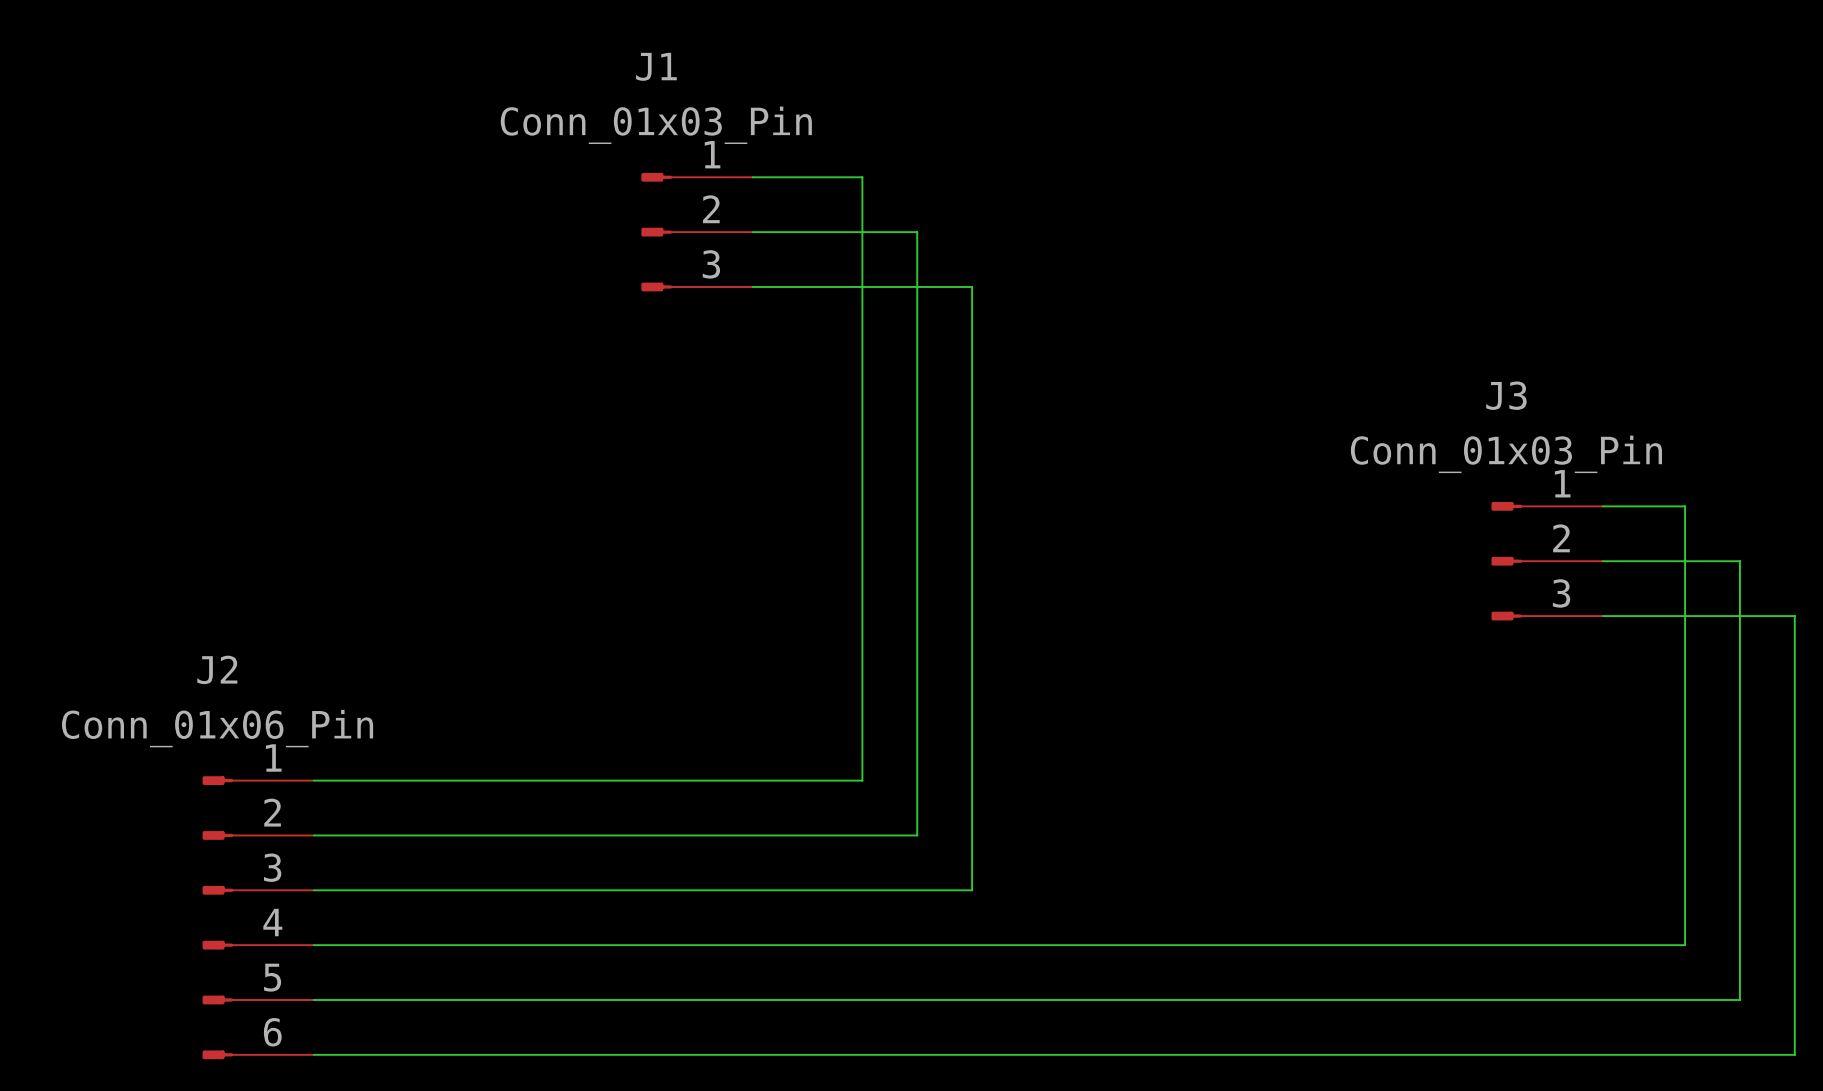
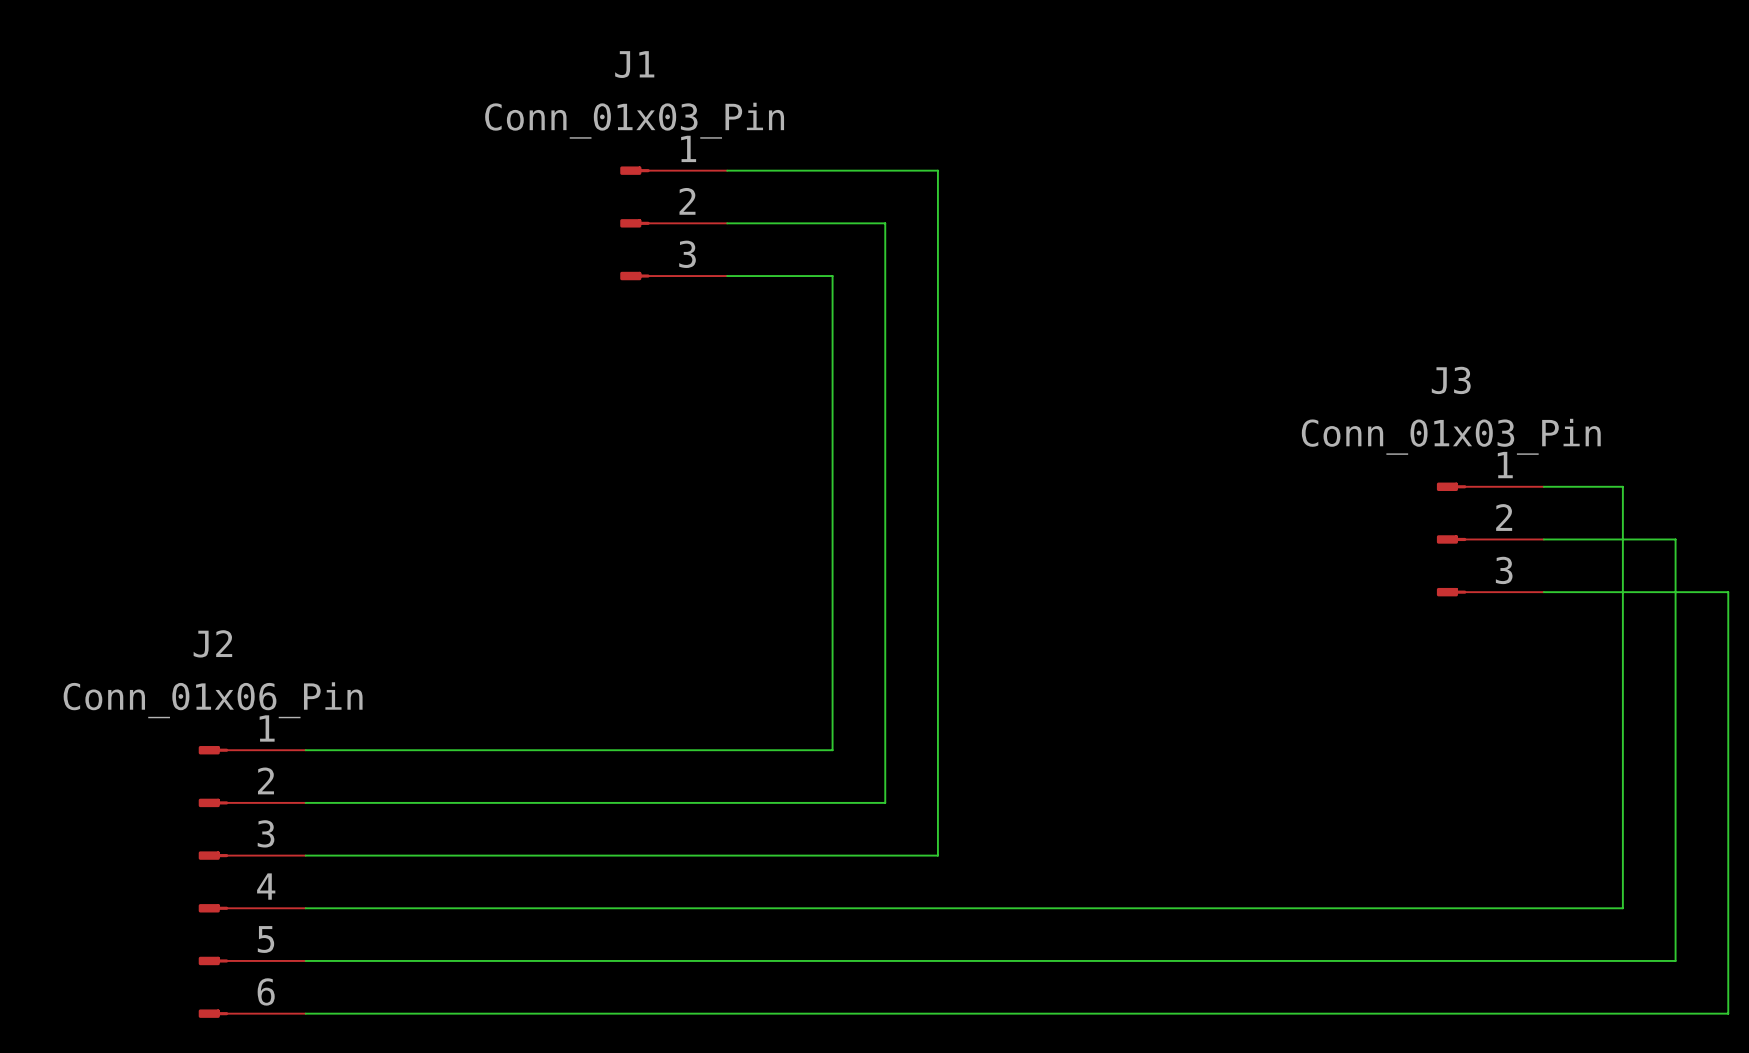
wire: (862, 177) (862, 286) (972, 286) -> (832, 170) (937, 170) (937, 276)

